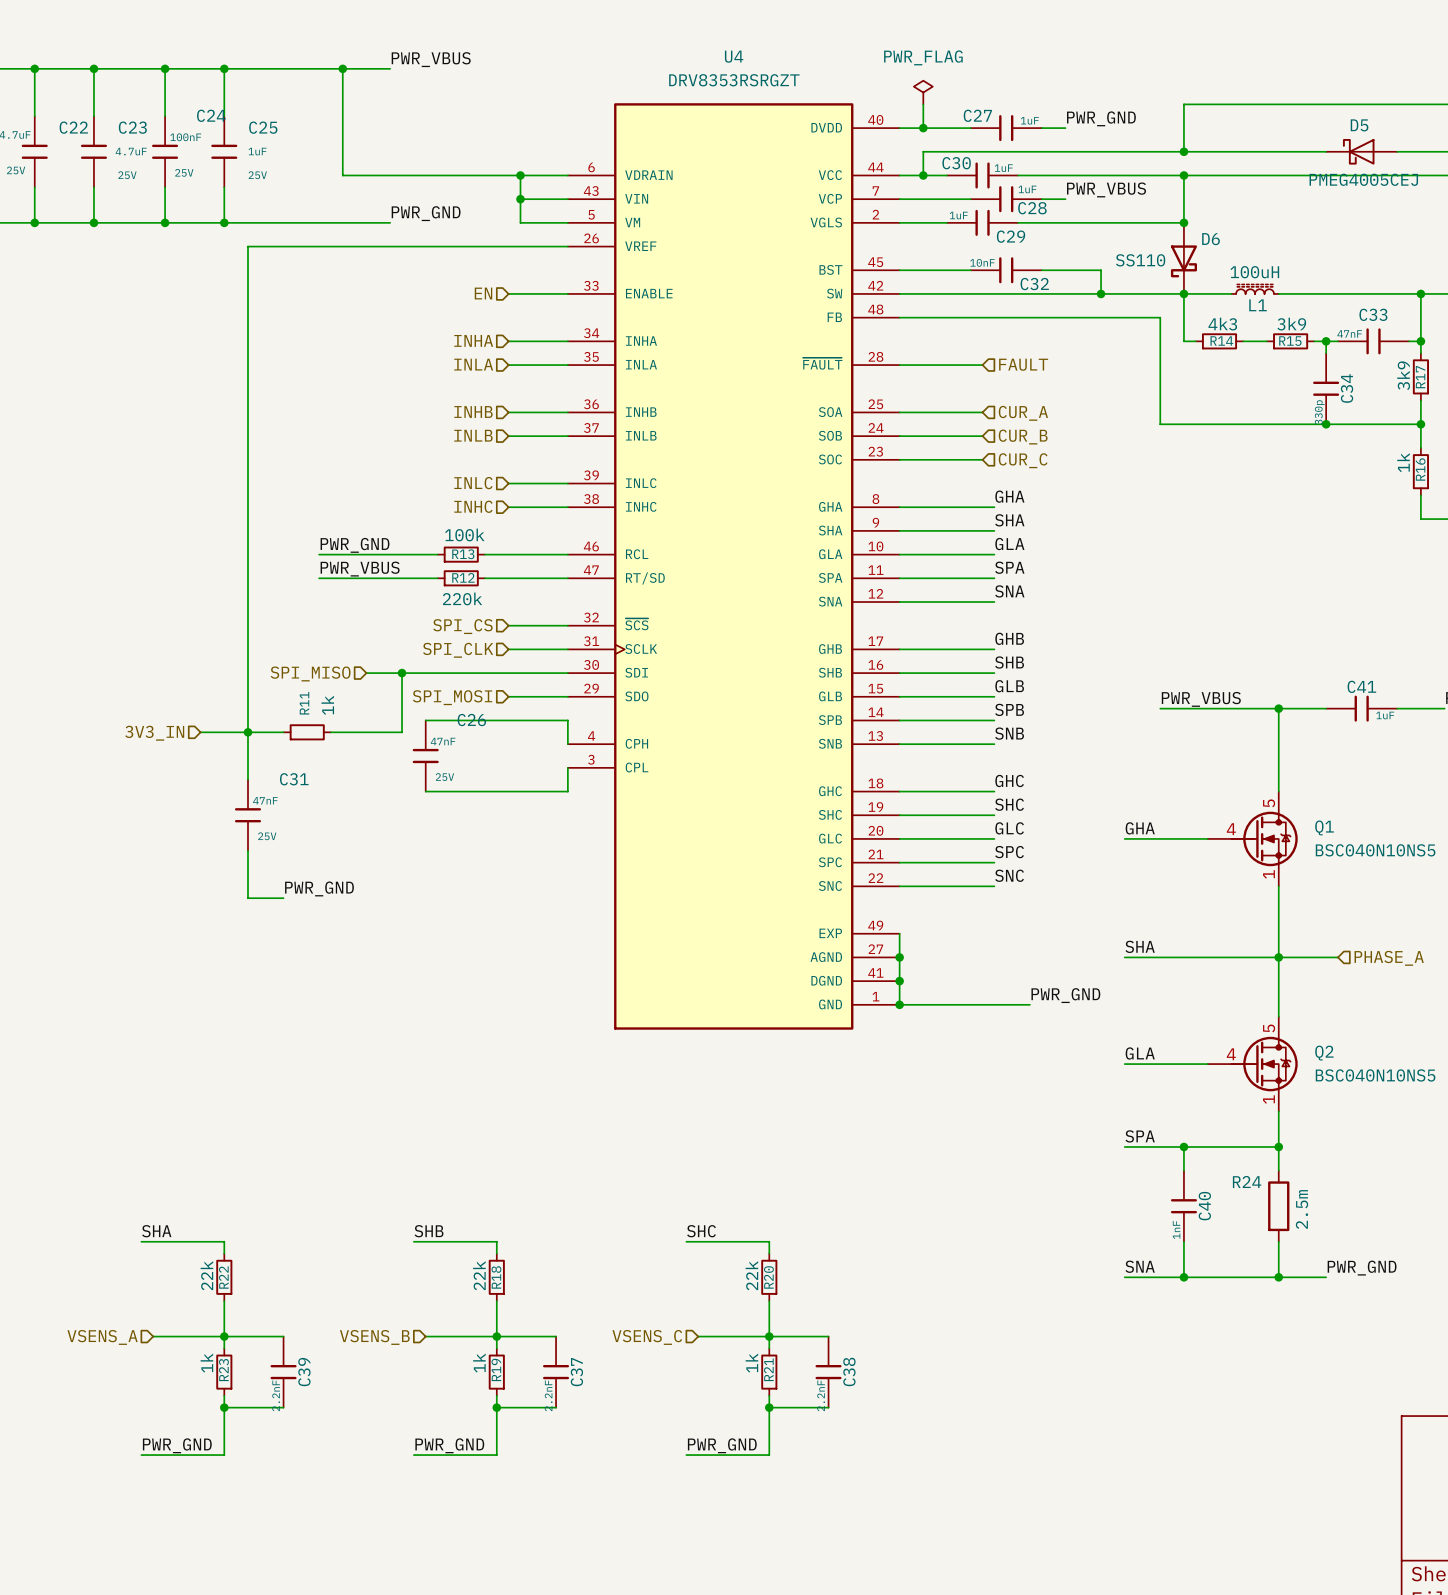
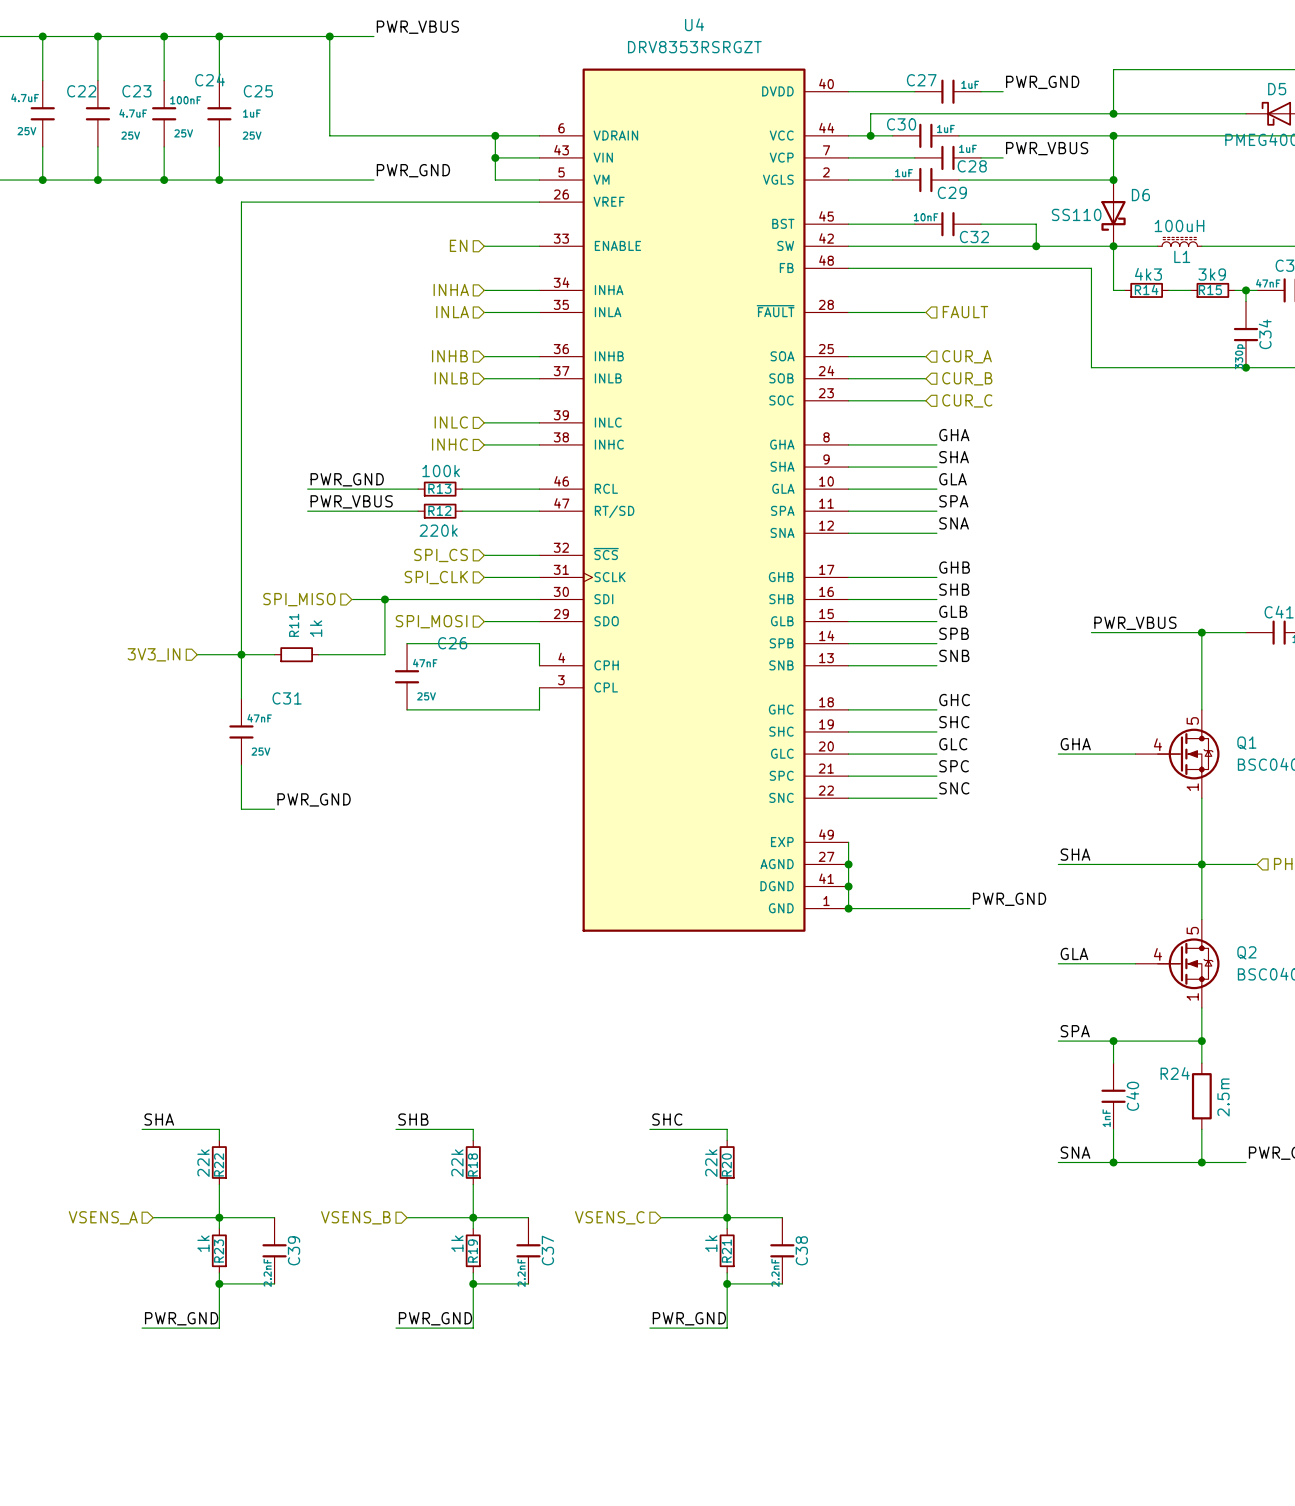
power symbol: PWR_FLAG (923, 92) -> none
wire: (923, 104) (923, 128) -> none
junction: (923, 128) -> none

